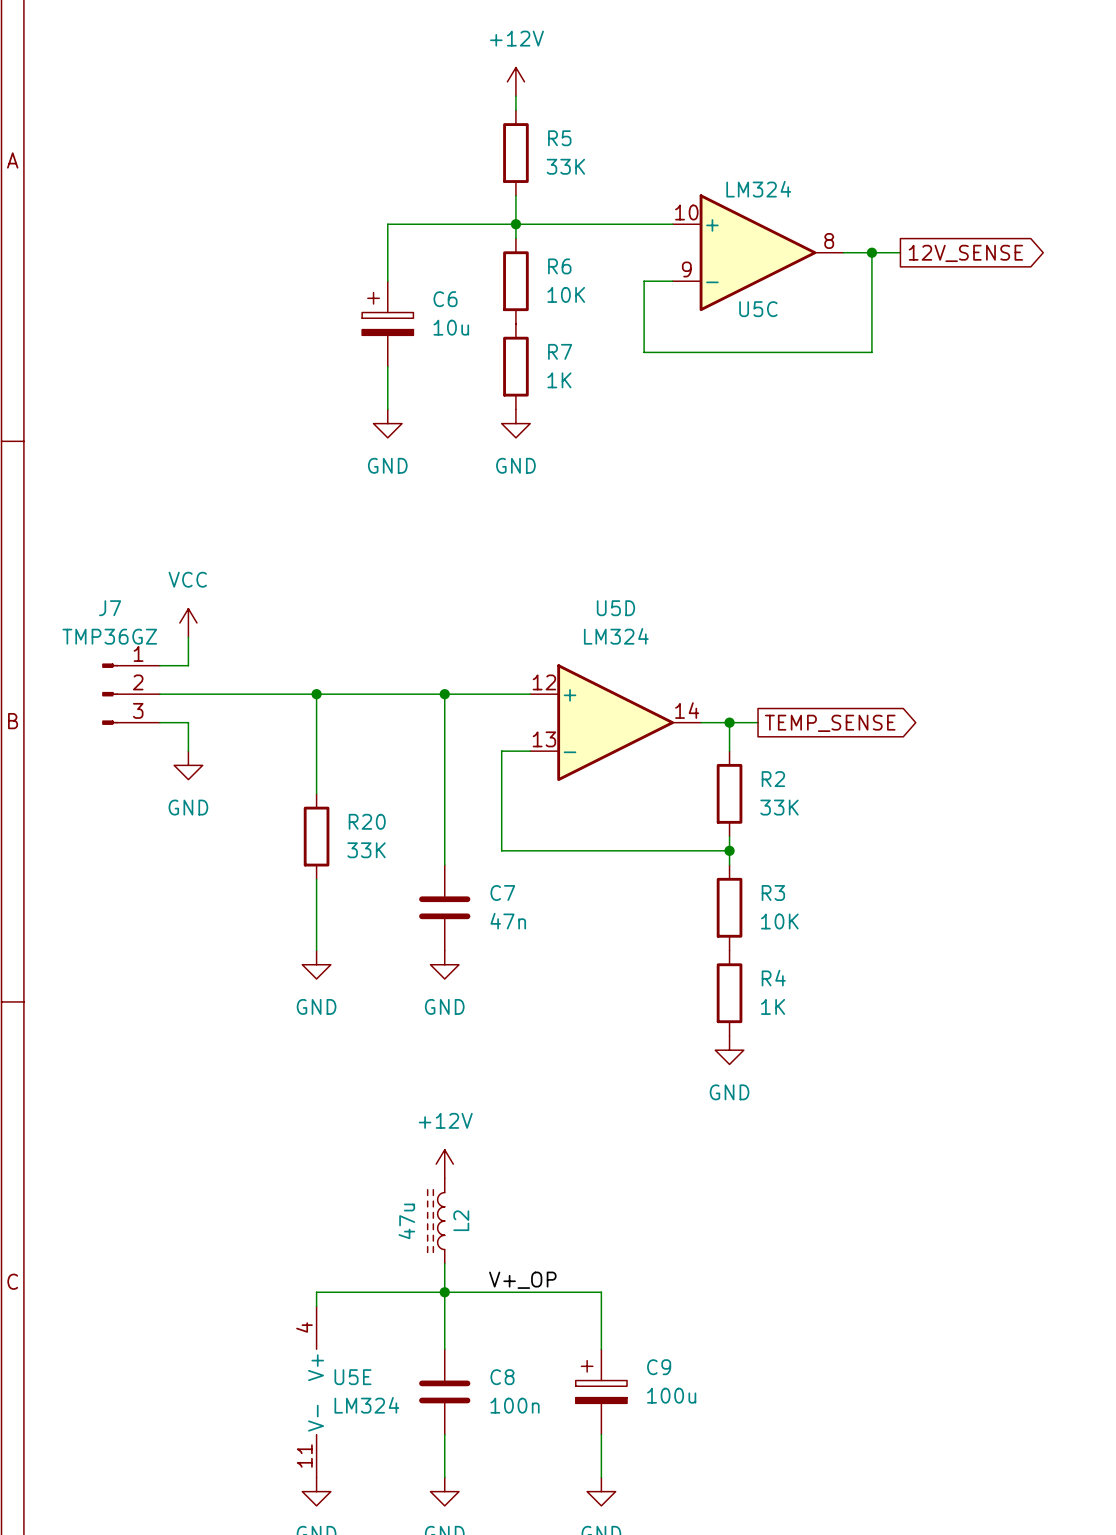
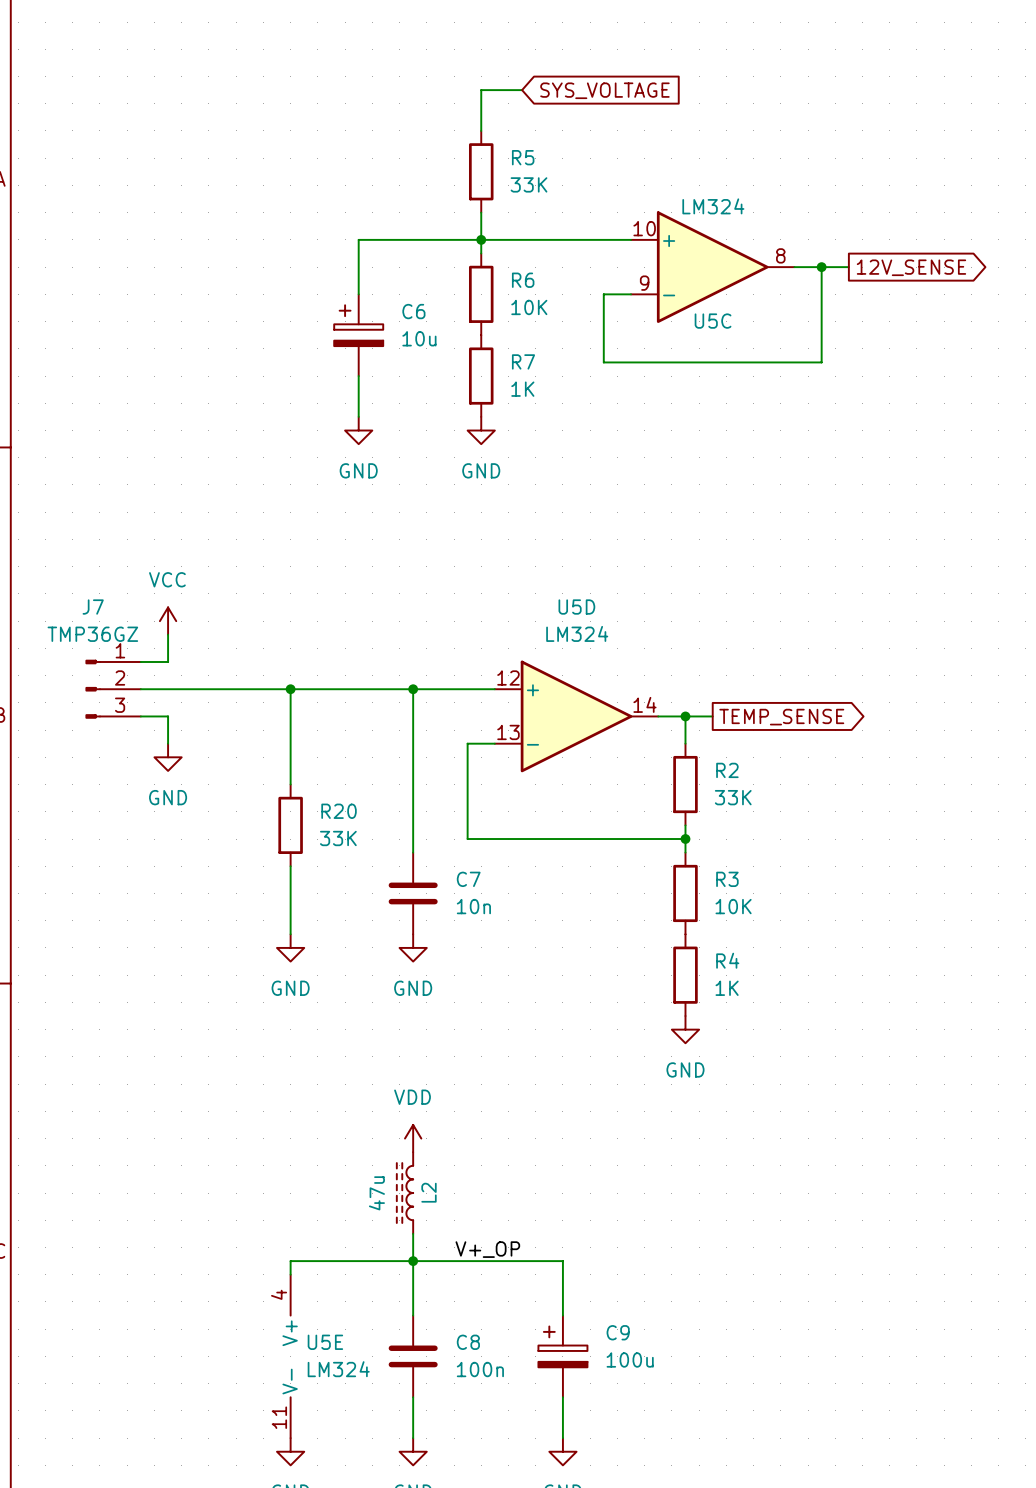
wire: none -> (522, 90) (481, 90) (481, 117)
global label: none -> SYS_VOLTAGE (604, 90)
power symbol: +12V (515, 81) -> none
C7 value: 47n (508, 921) -> 10n (473, 906)
power symbol: +12V (444, 1164) -> VDD (413, 1138)

